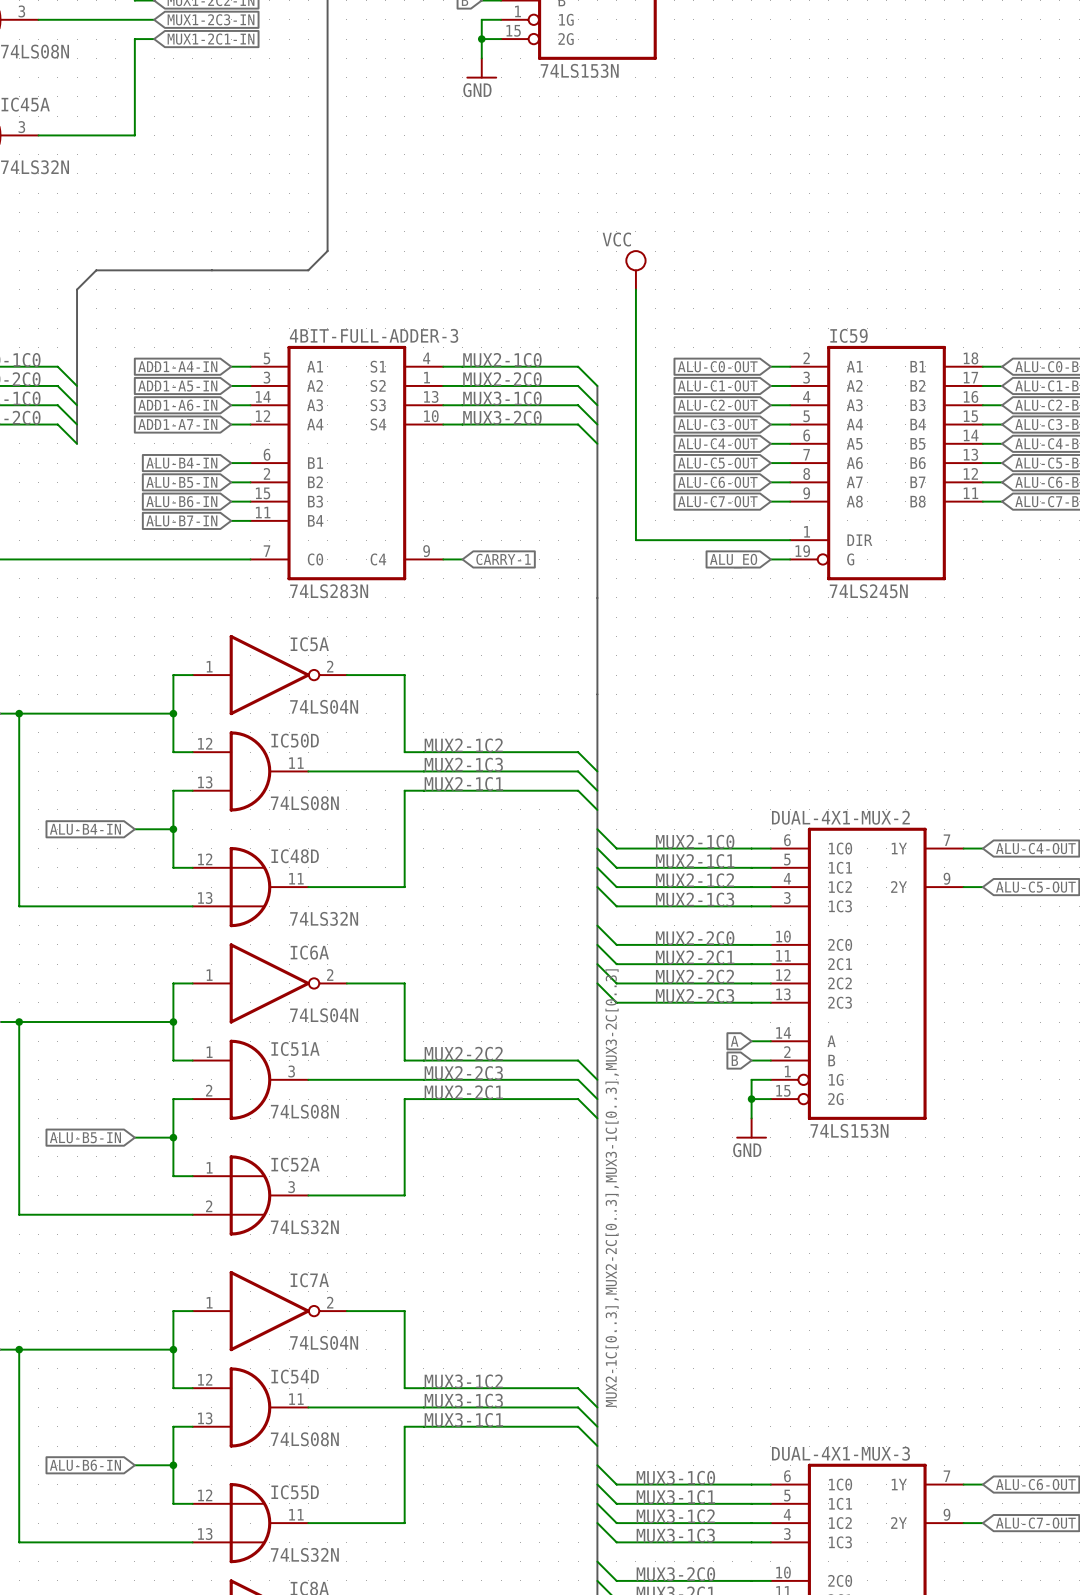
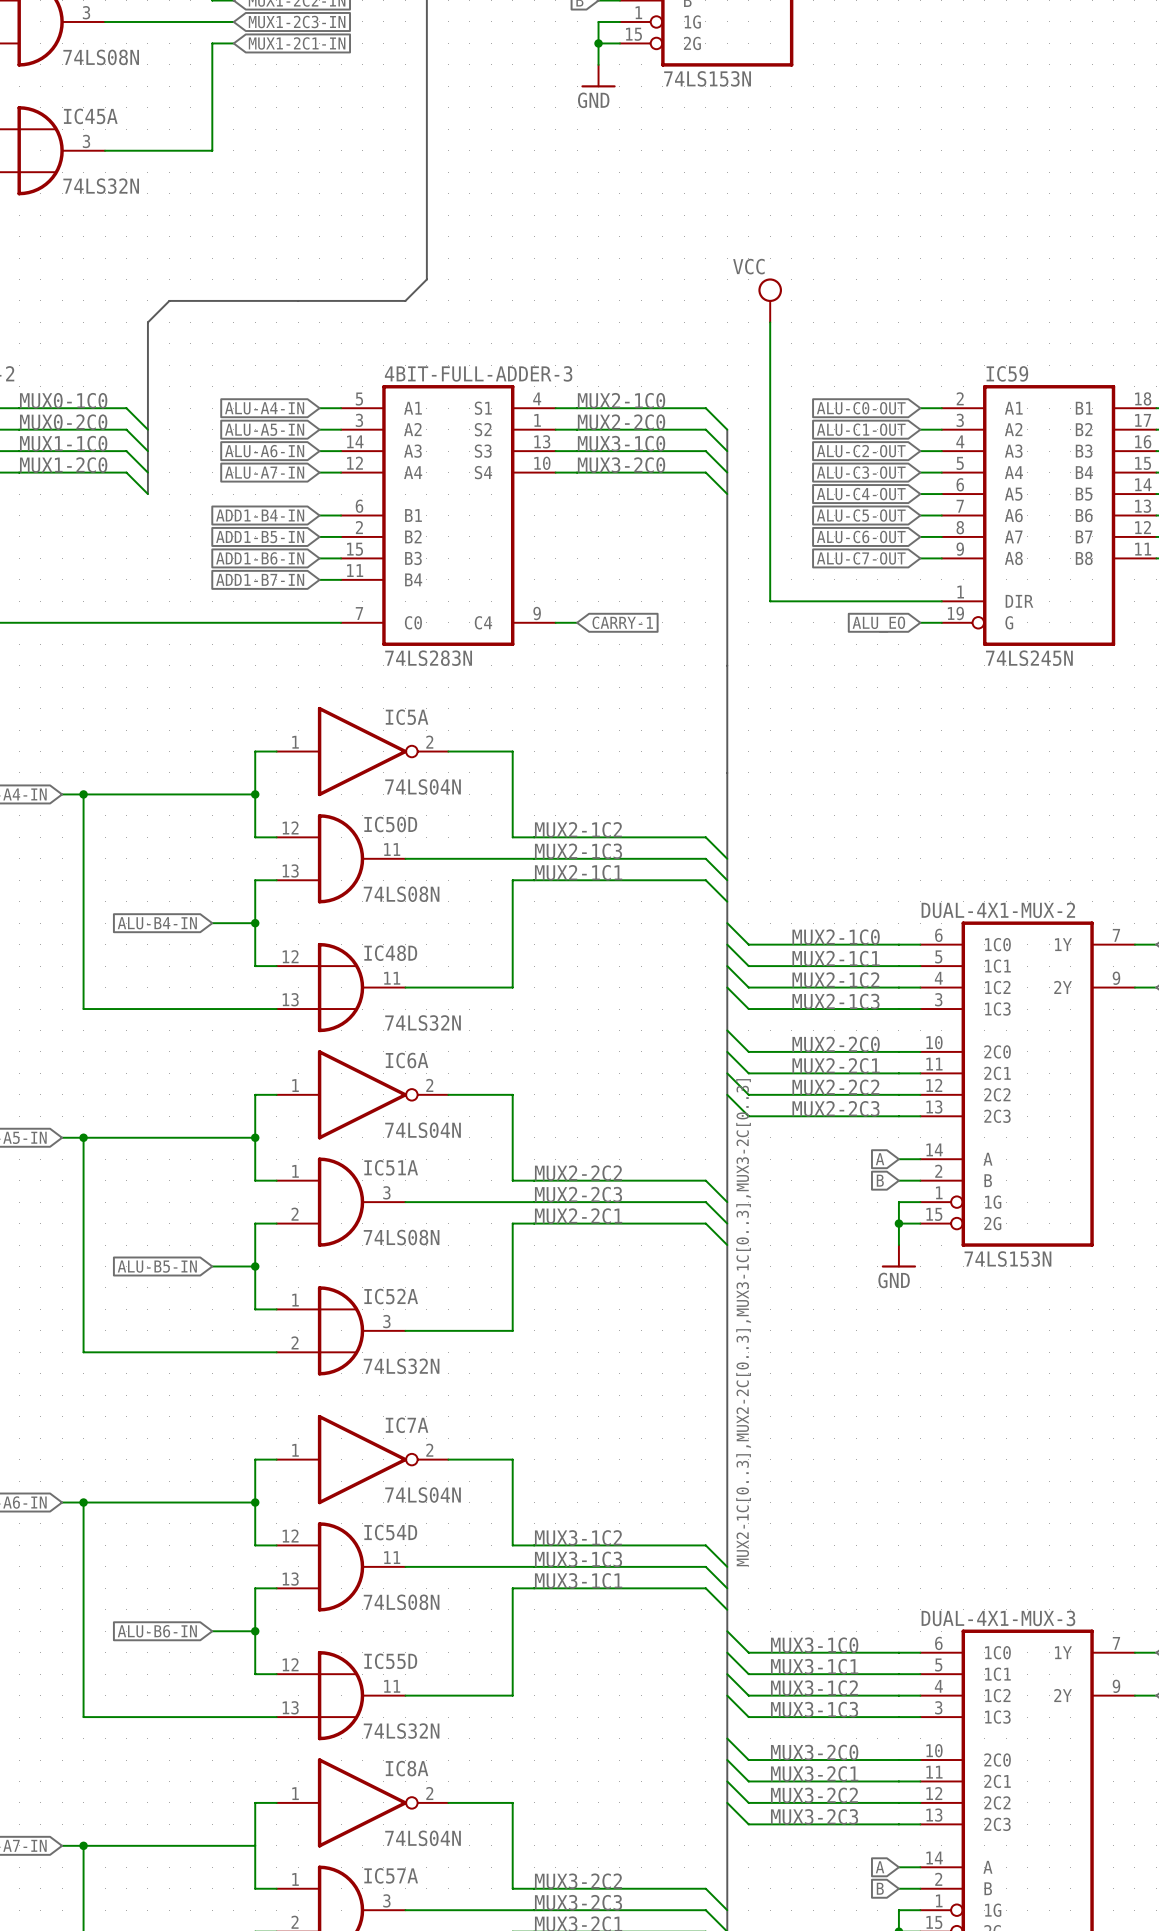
global label: ADD1-A4-IN (177, 366) -> ALU-A4-IN (264, 408)
global label: ADD1-A5-IN (177, 386) -> ALU-A5-IN (264, 429)
global label: ADD1-A6-IN (177, 405) -> ALU-A6-IN (264, 451)
global label: ADD1-A7-IN (177, 424) -> ALU-A7-IN (264, 472)
global label: ALU-B4-IN (181, 463) -> ADD1-B4-IN (260, 515)
global label: ALU-B5-IN (181, 482) -> ADD1-B5-IN (260, 537)
global label: ALU-B6-IN (181, 501) -> ADD1-B6-IN (260, 558)
global label: ALU-B7-IN (181, 521) -> ADD1-B7-IN (260, 579)

